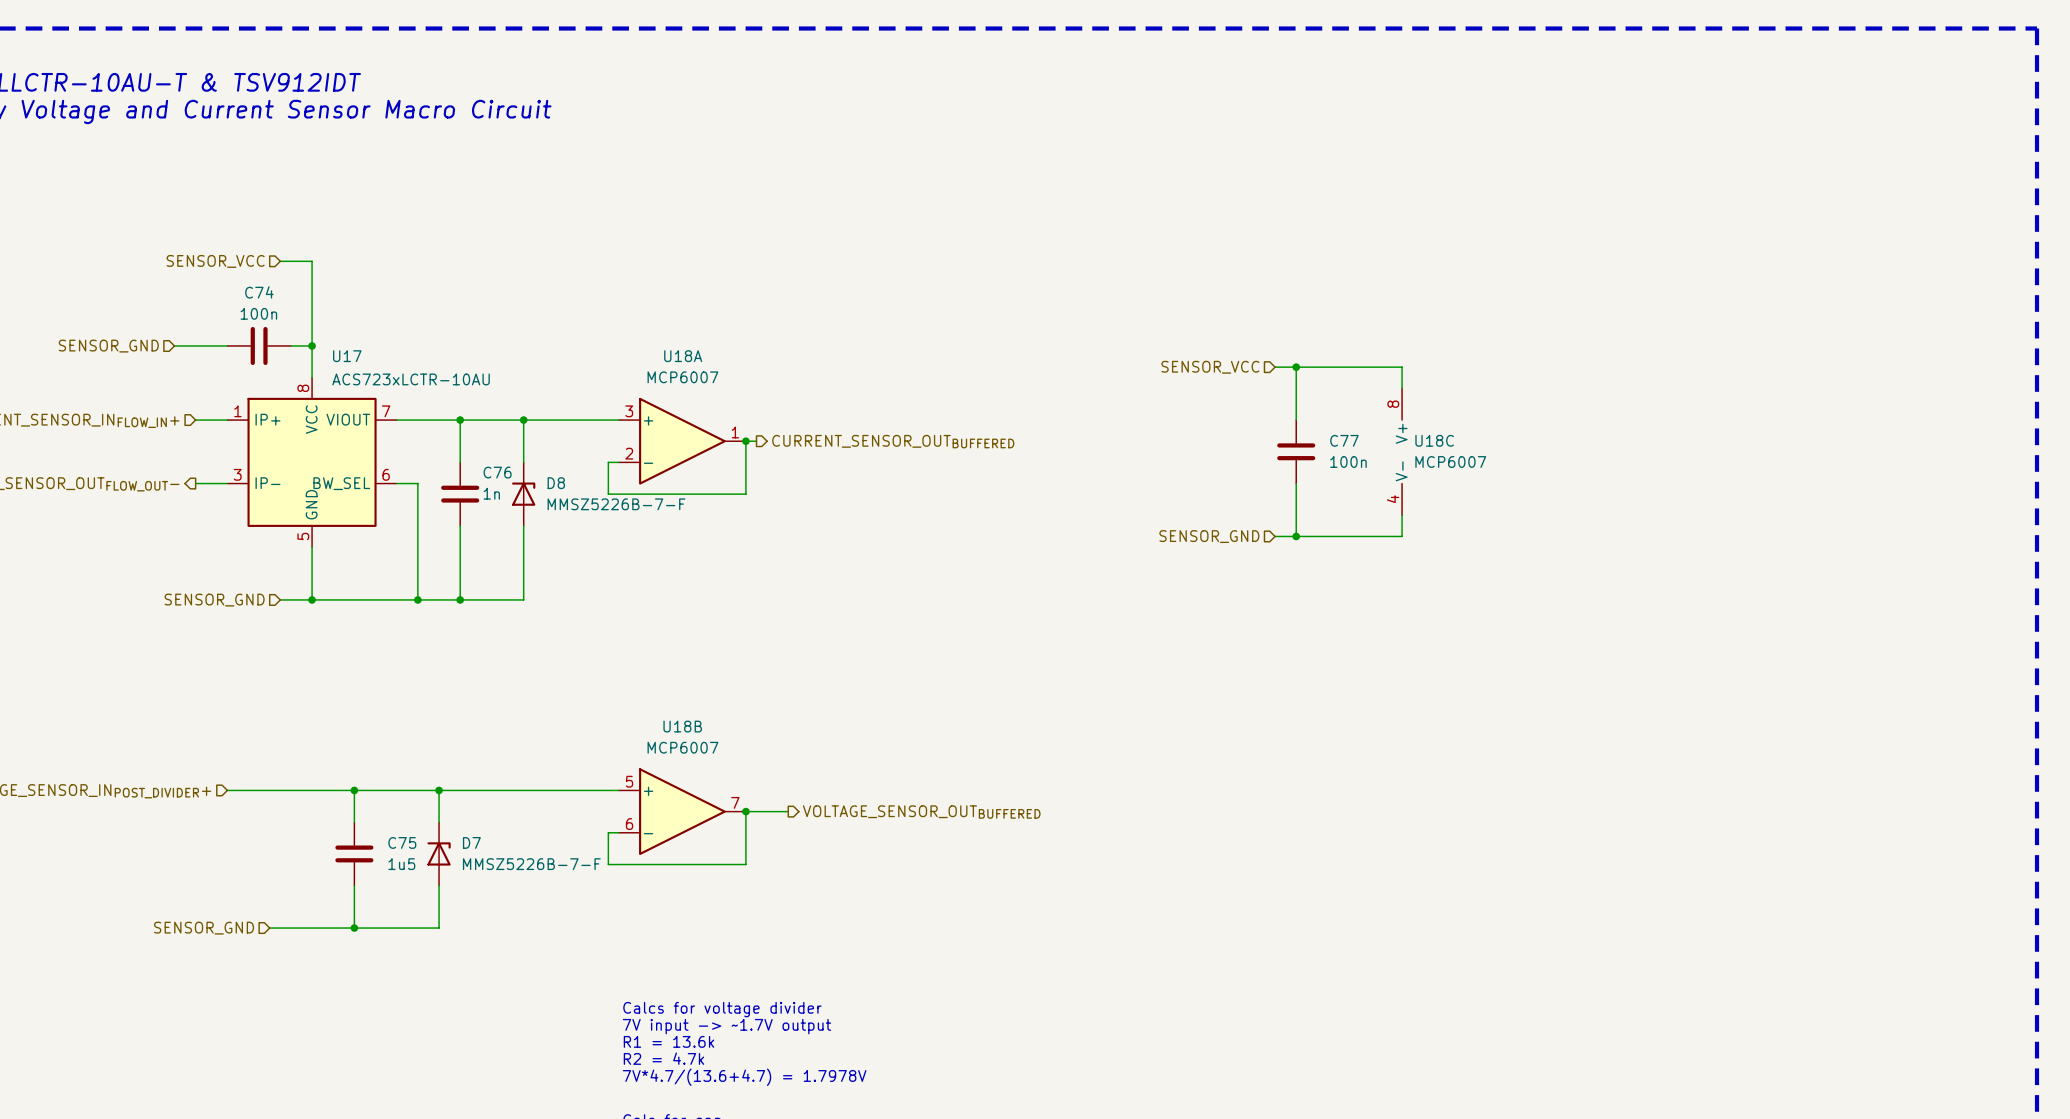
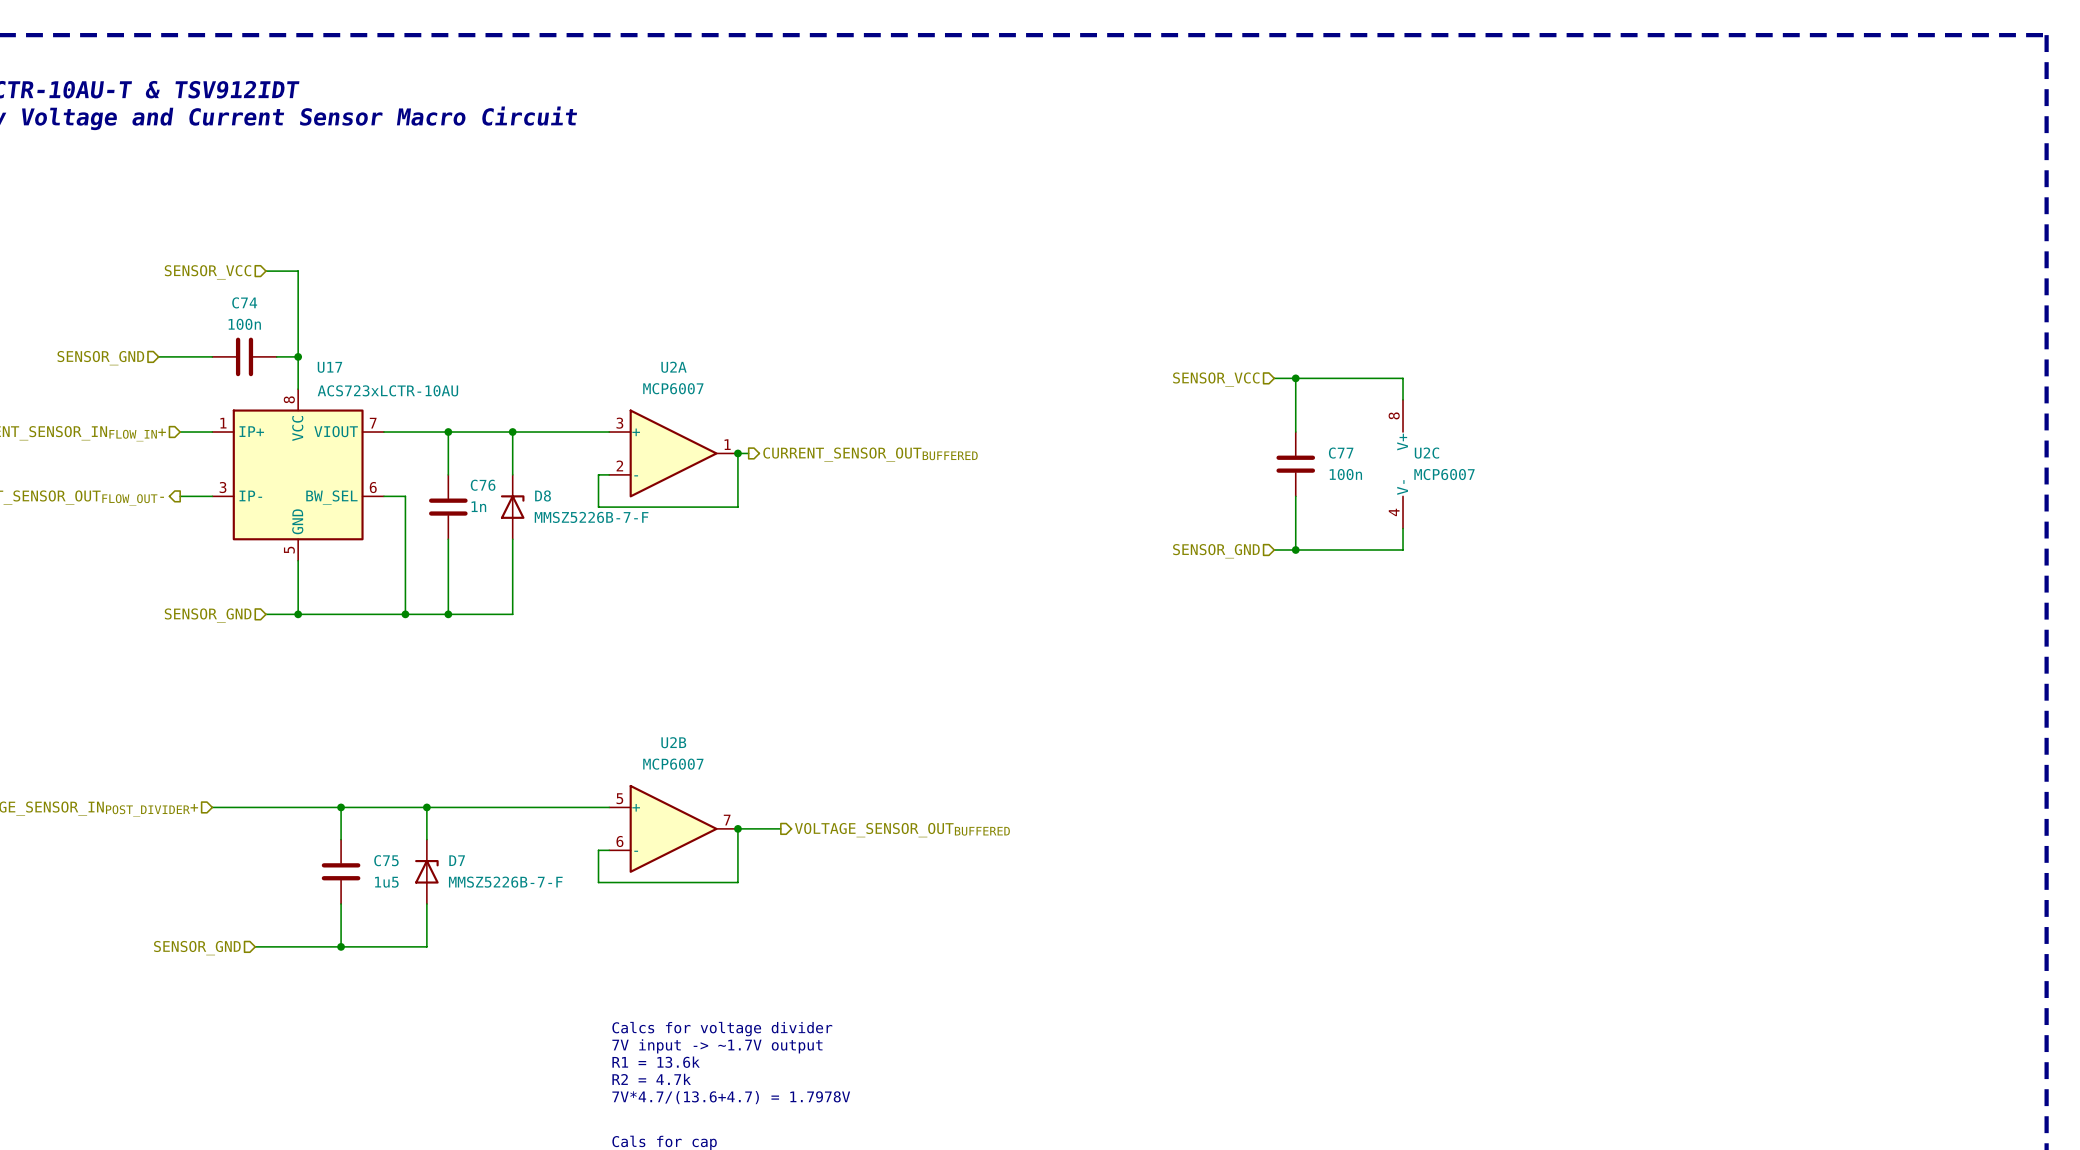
U18A name: U18A (683, 356) -> U2A (673, 367)
U18C name: U18C (1434, 440) -> U2C (1426, 453)
U18B name: U18B (682, 726) -> U2B (673, 742)

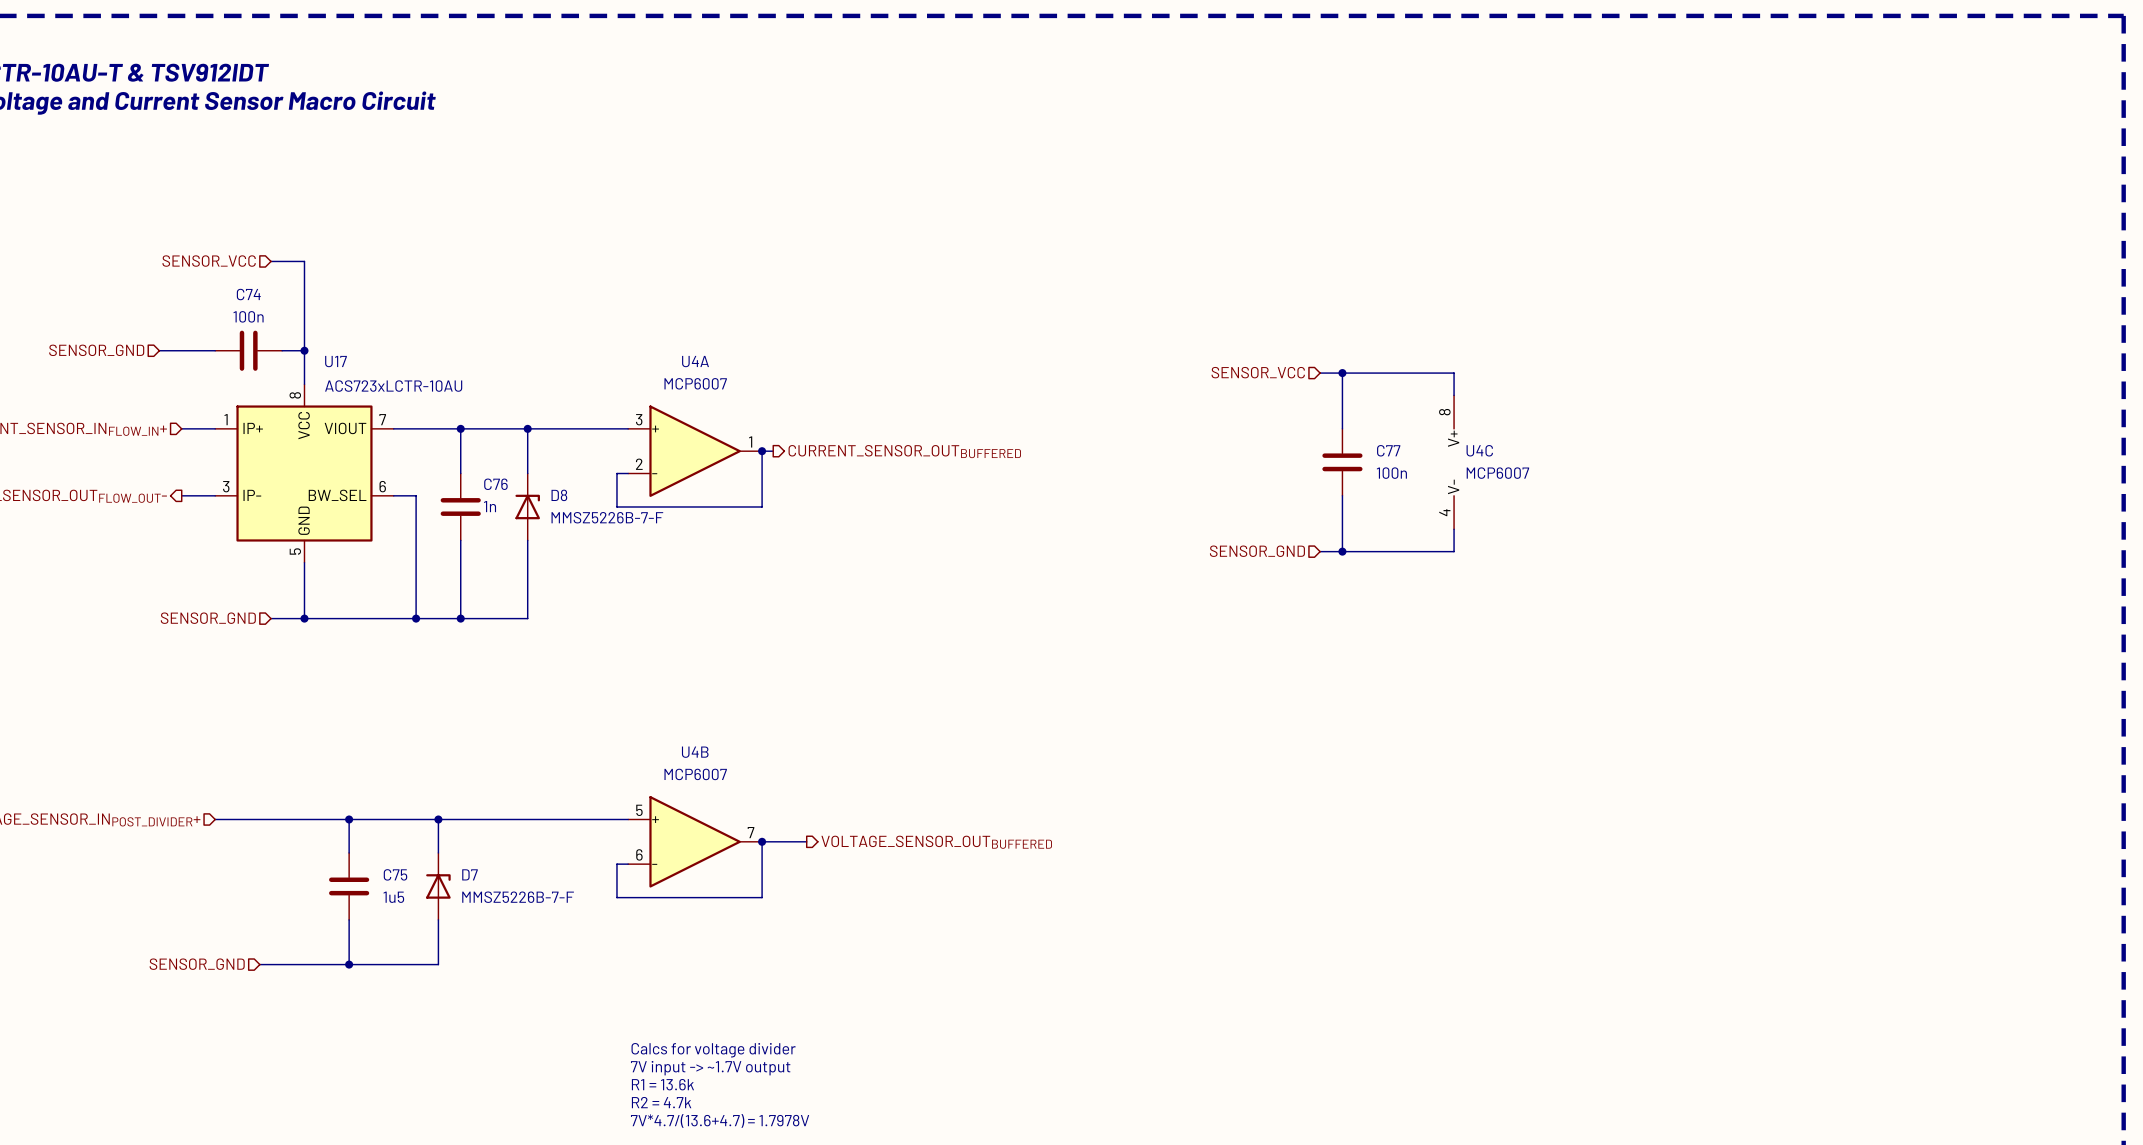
U2A name: U2A (673, 367) -> U4A (695, 361)
U2C name: U2C (1426, 453) -> U4C (1479, 450)
U2B name: U2B (673, 742) -> U4B (695, 752)

